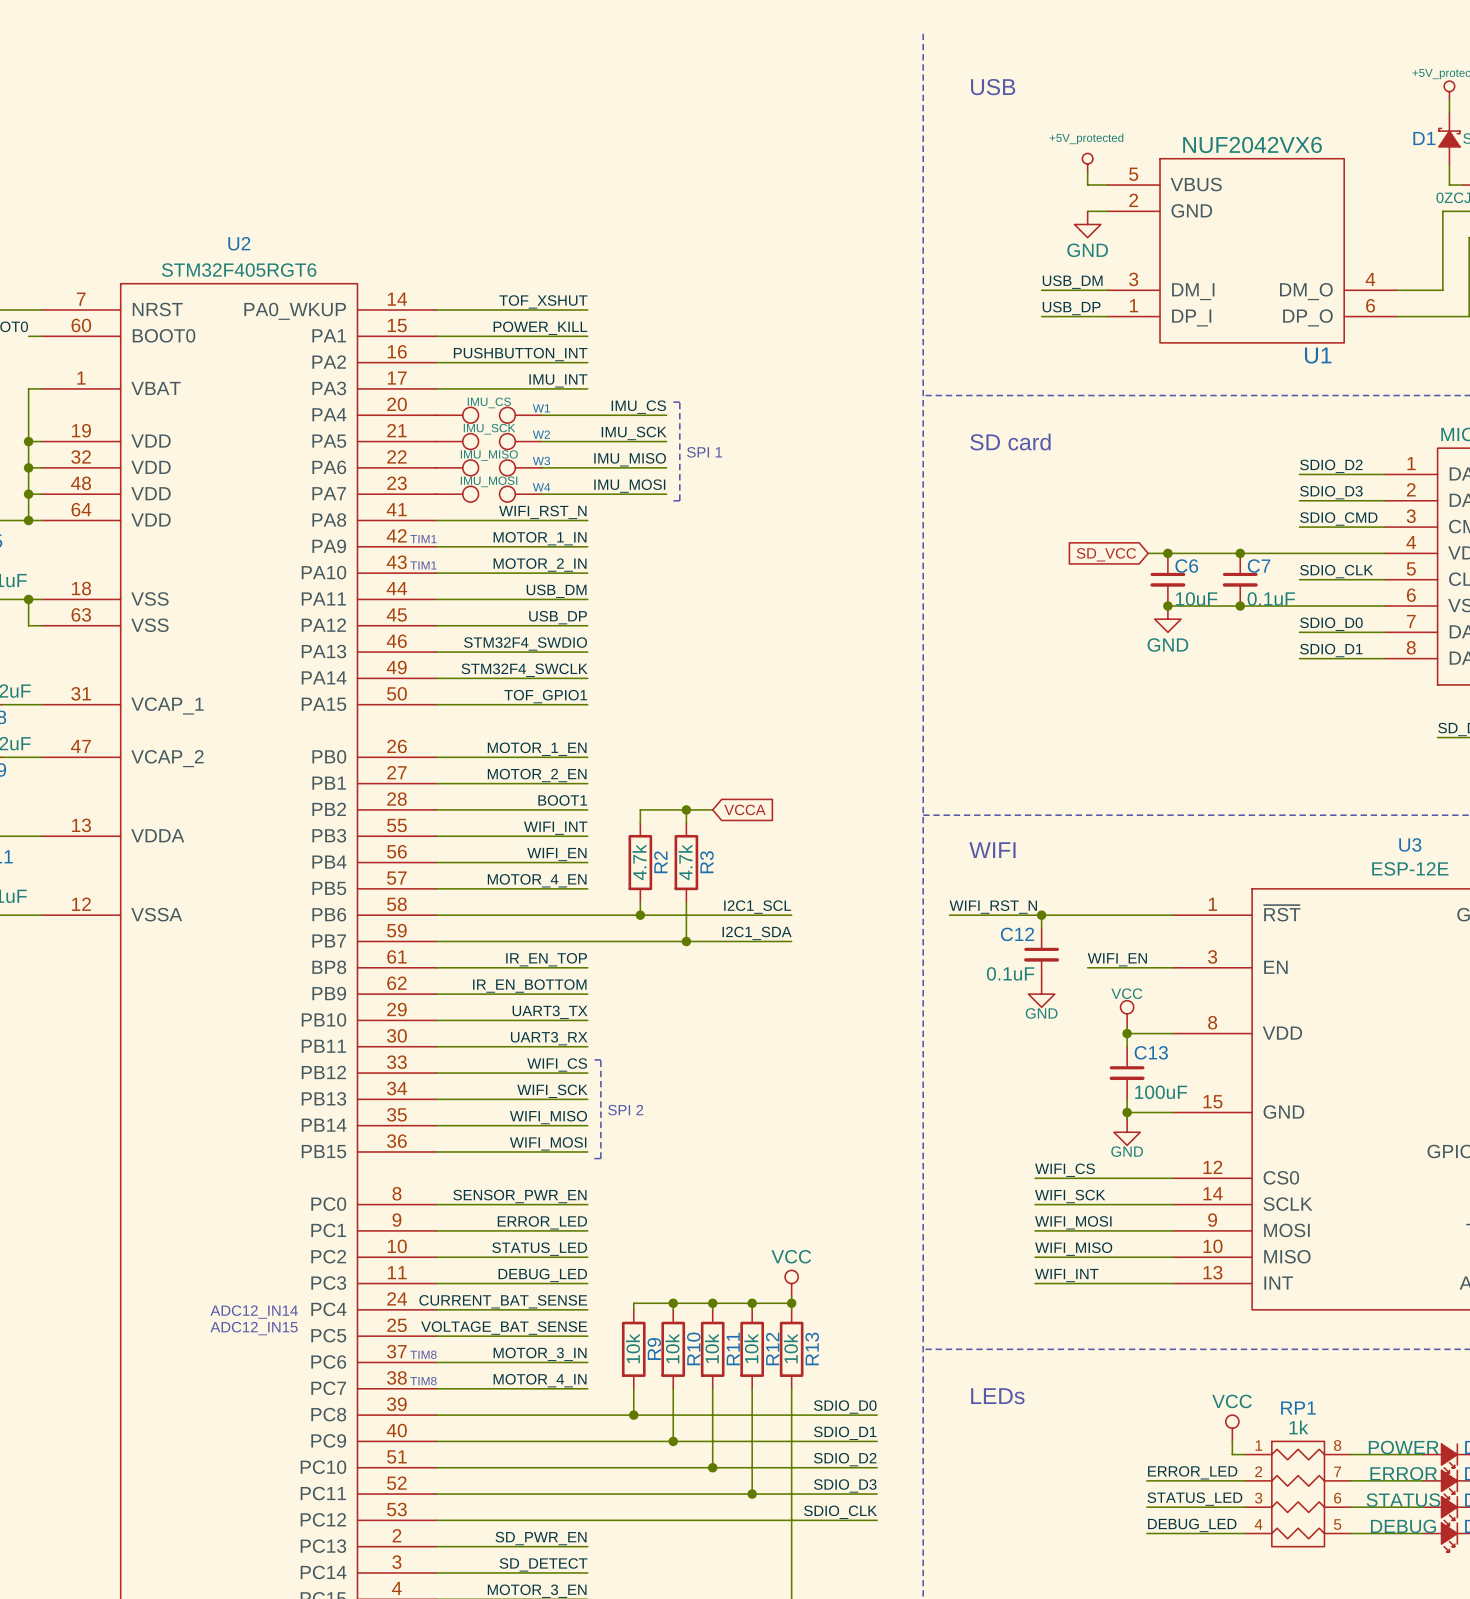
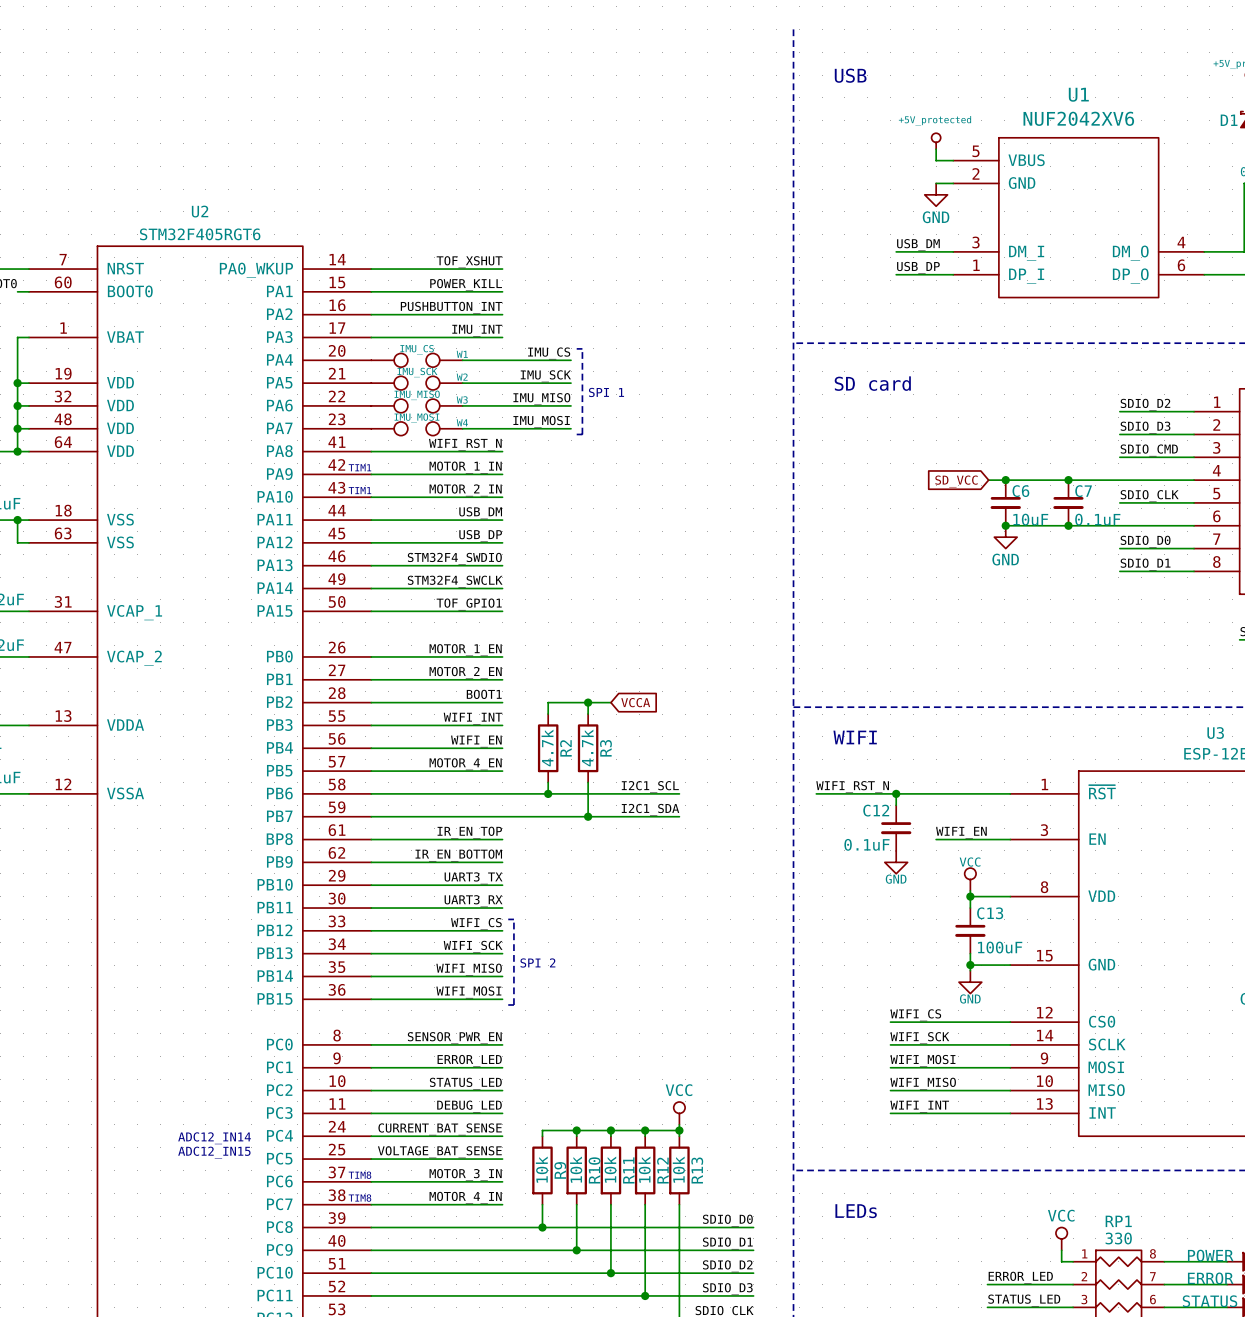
U1 value: NUF2042VX6 (1252, 144) -> NUF2042XV6 (1078, 118)
U1 name position: U1 (1318, 355) -> U1 (1078, 94)
RP1 value: 1k (1298, 1427) -> 330 (1118, 1238)

